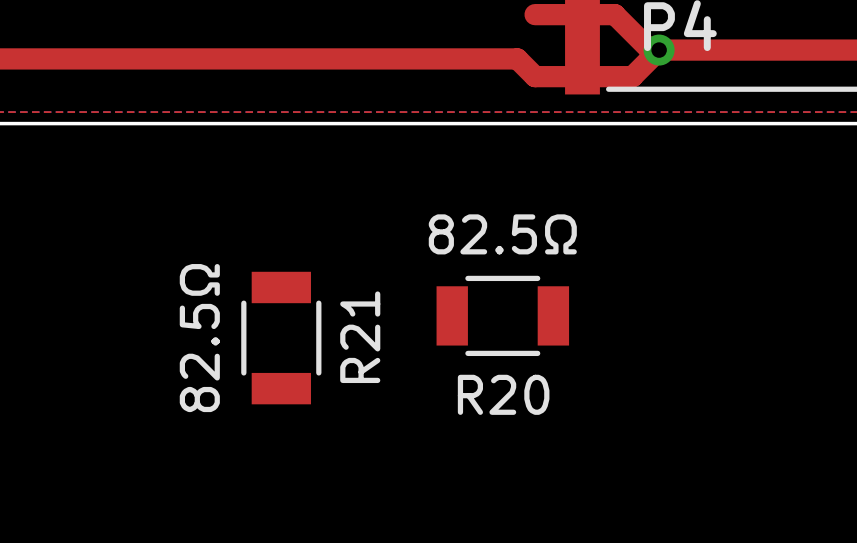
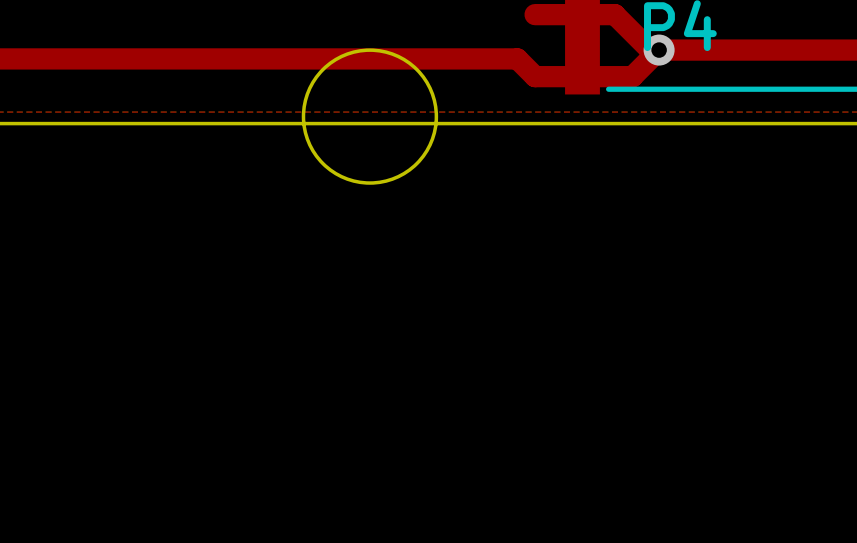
round board edge: none -> [301, 48, 439, 185]
R20: 82.5Ω (502, 315) -> none
R21: 82.5Ω (281, 338) -> none

